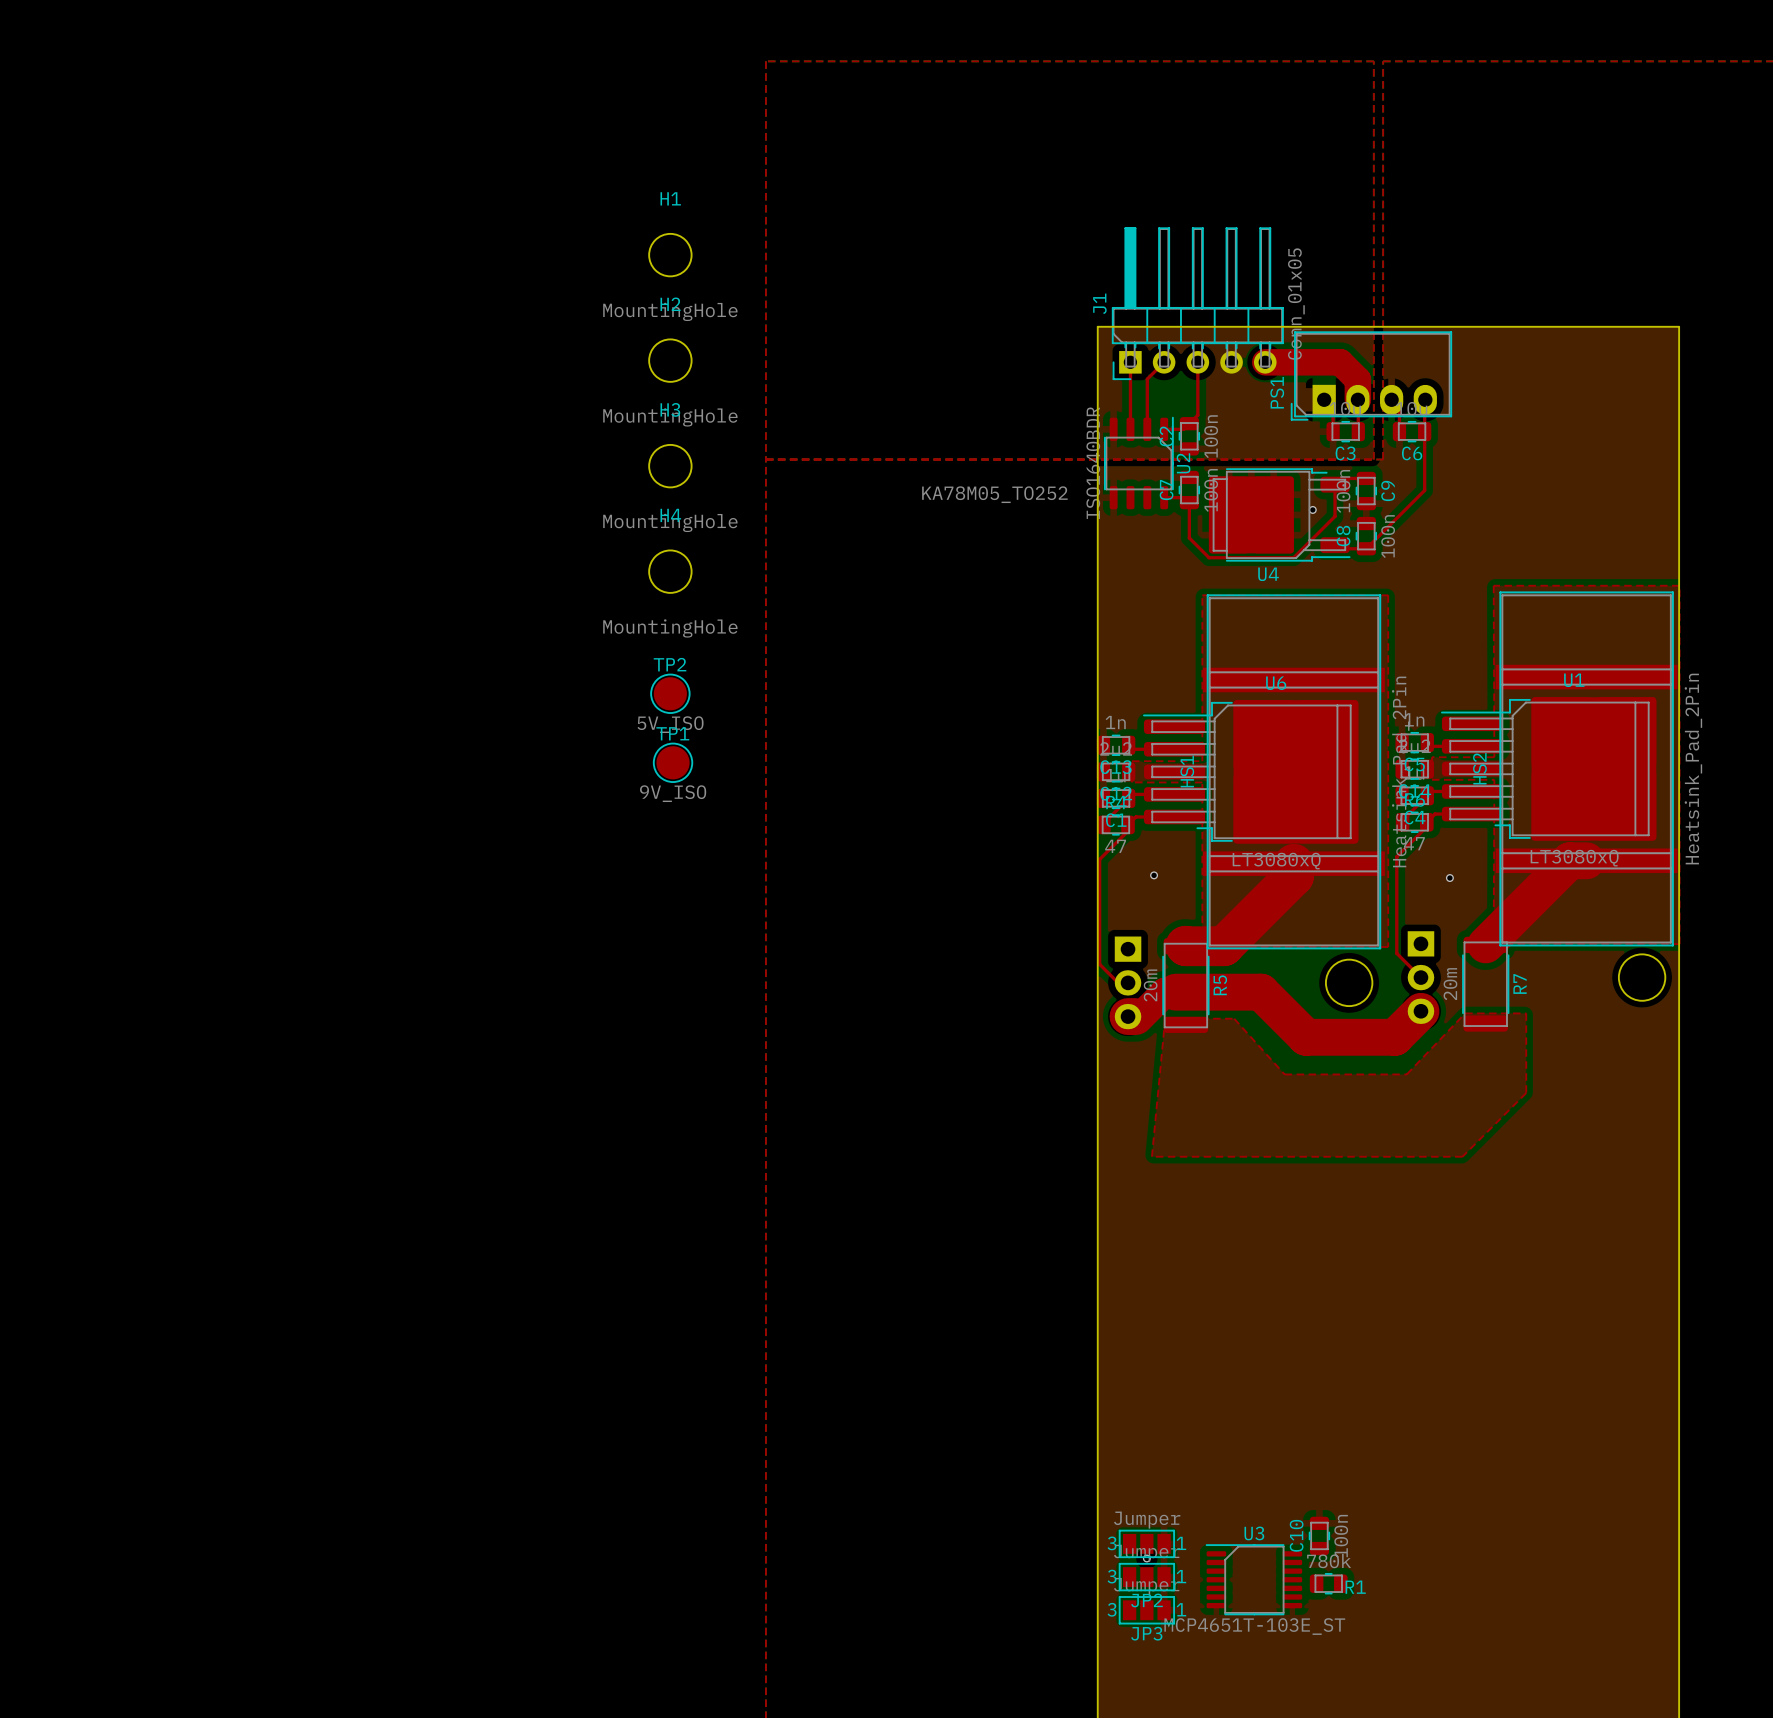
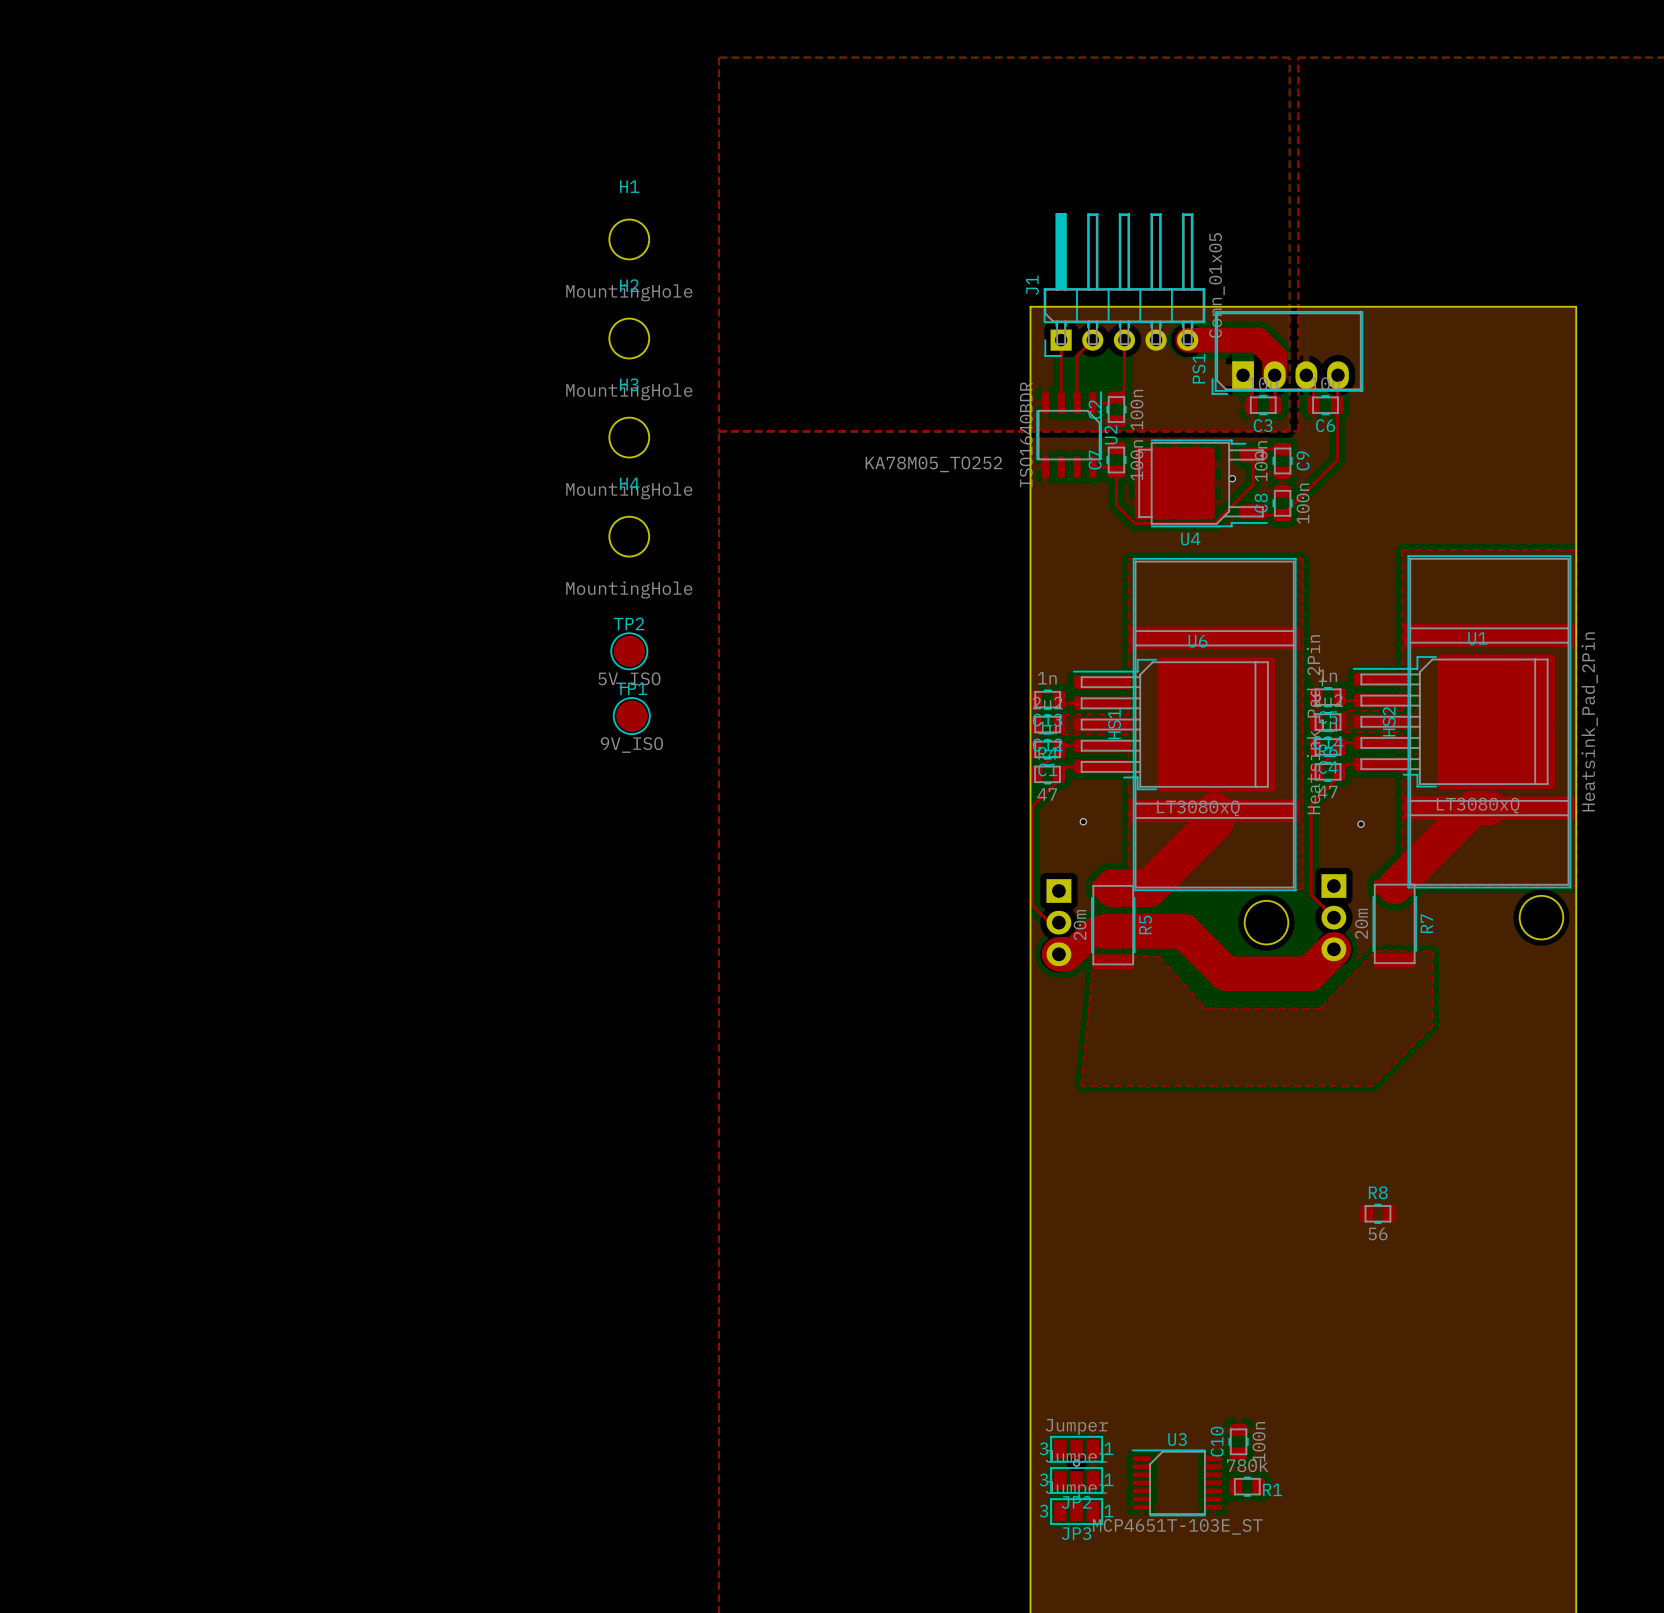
R8: none -> 56 (1377, 1213)

